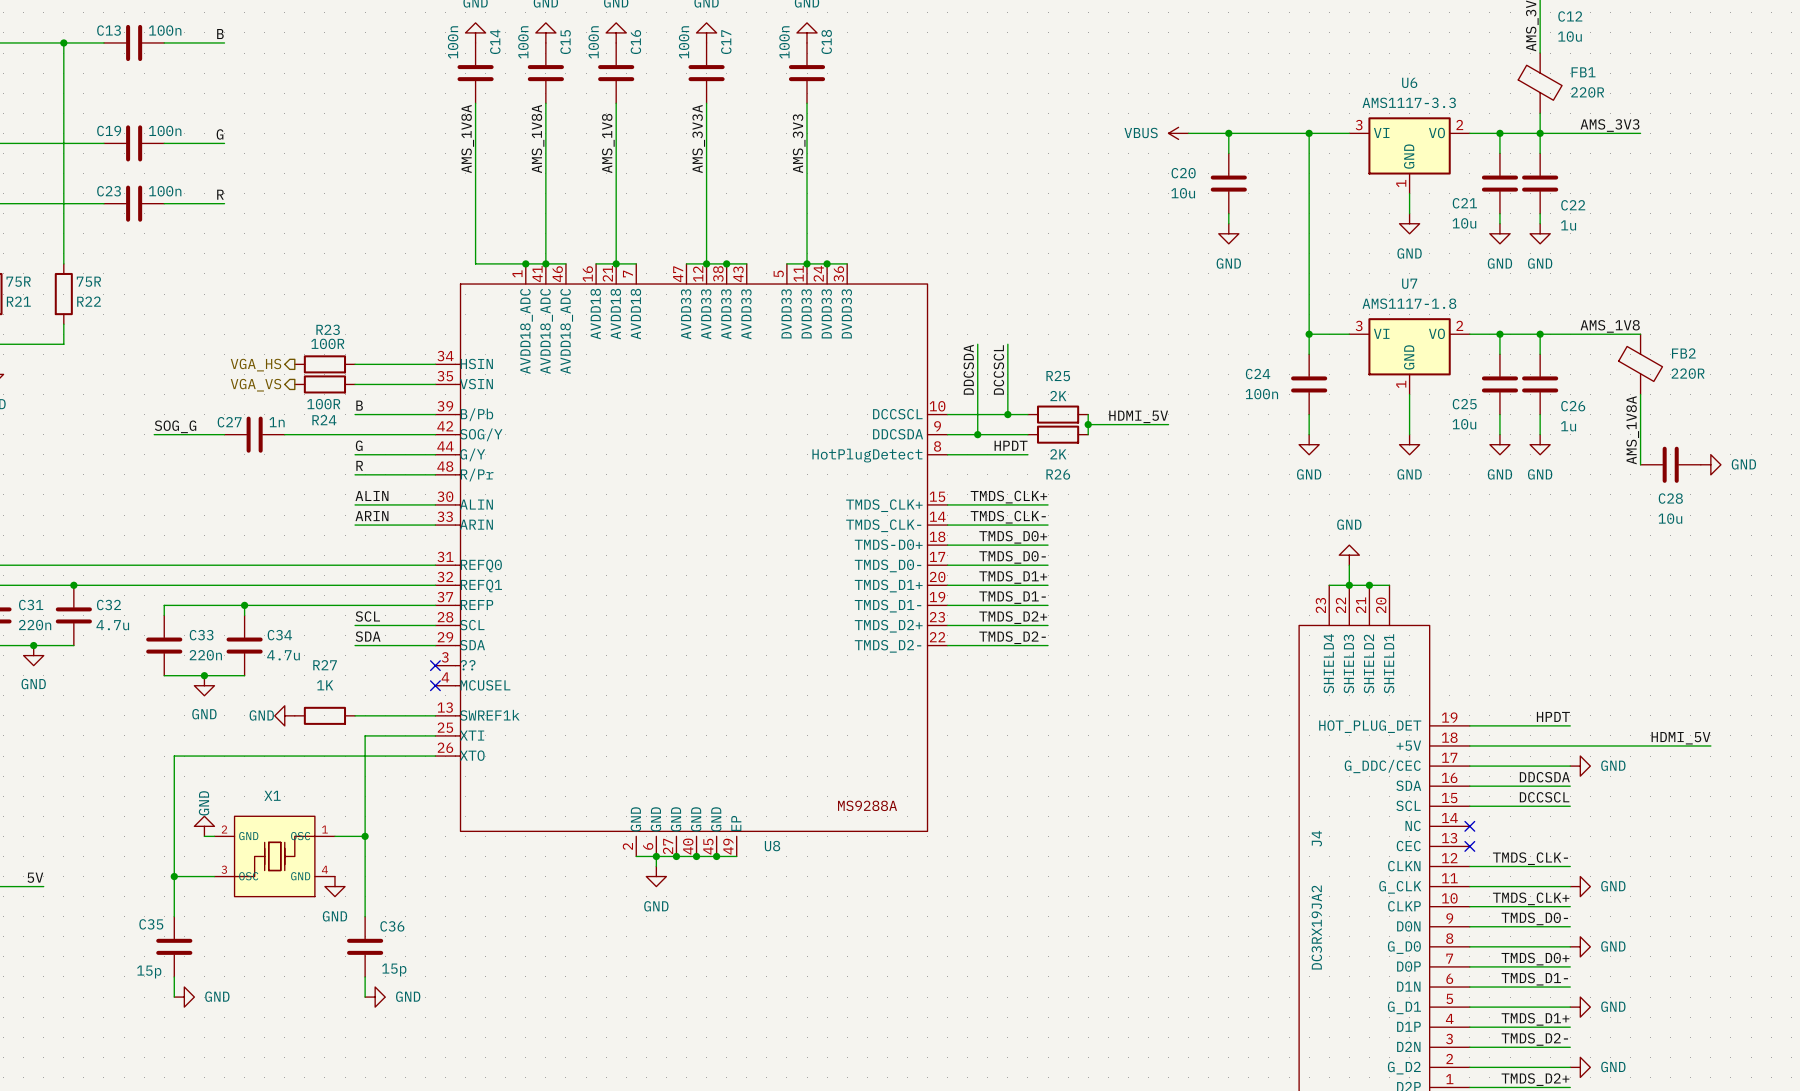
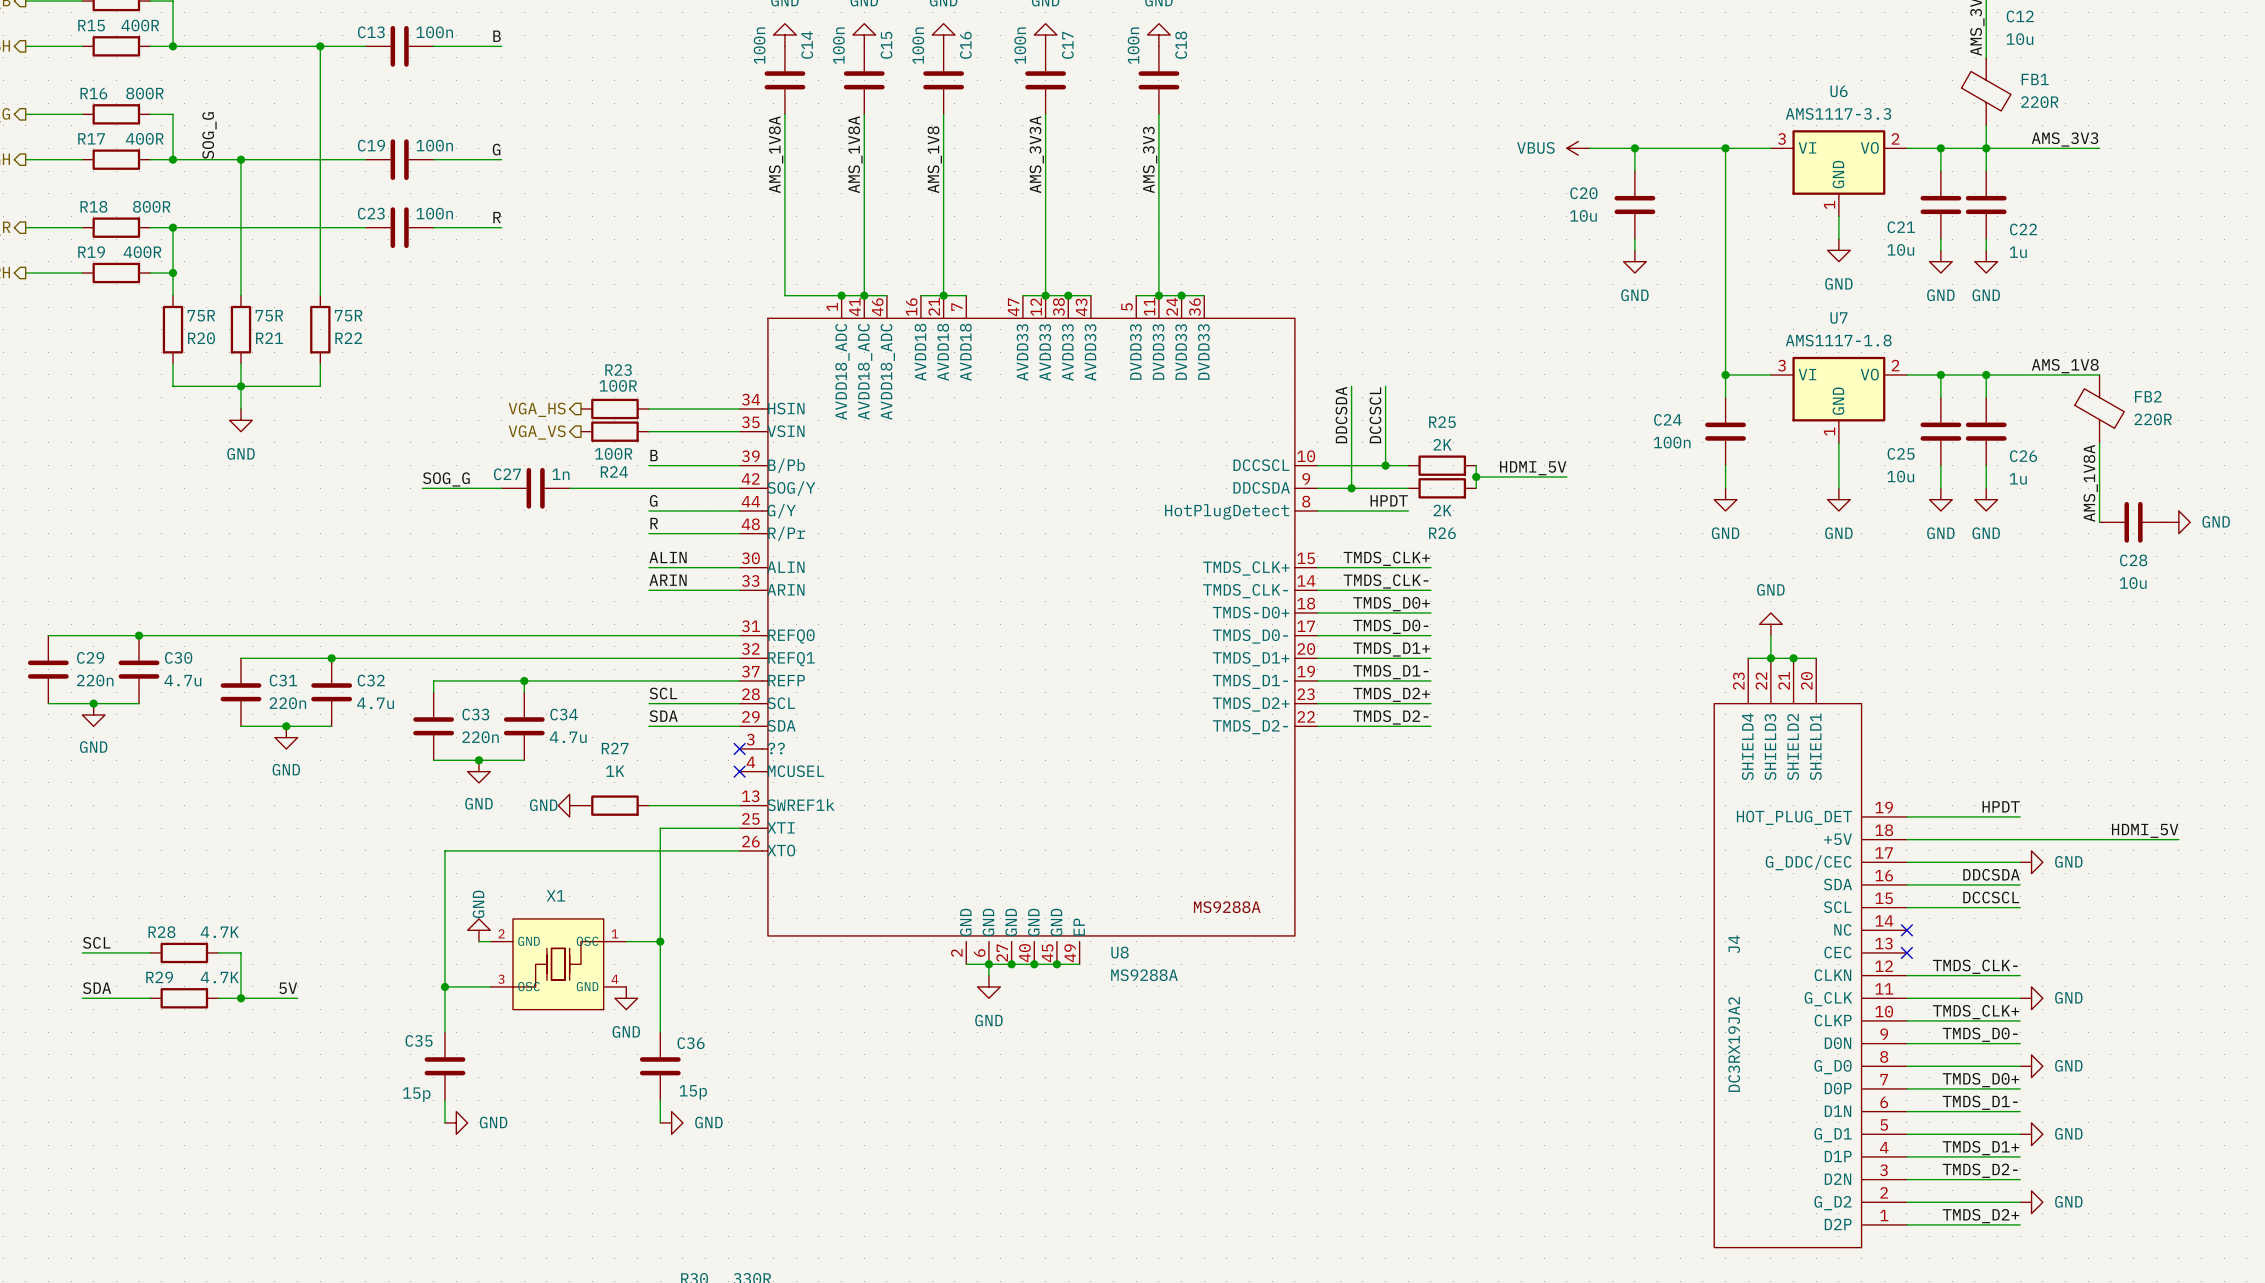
U8 value: none -> MS9288A (1144, 975)

